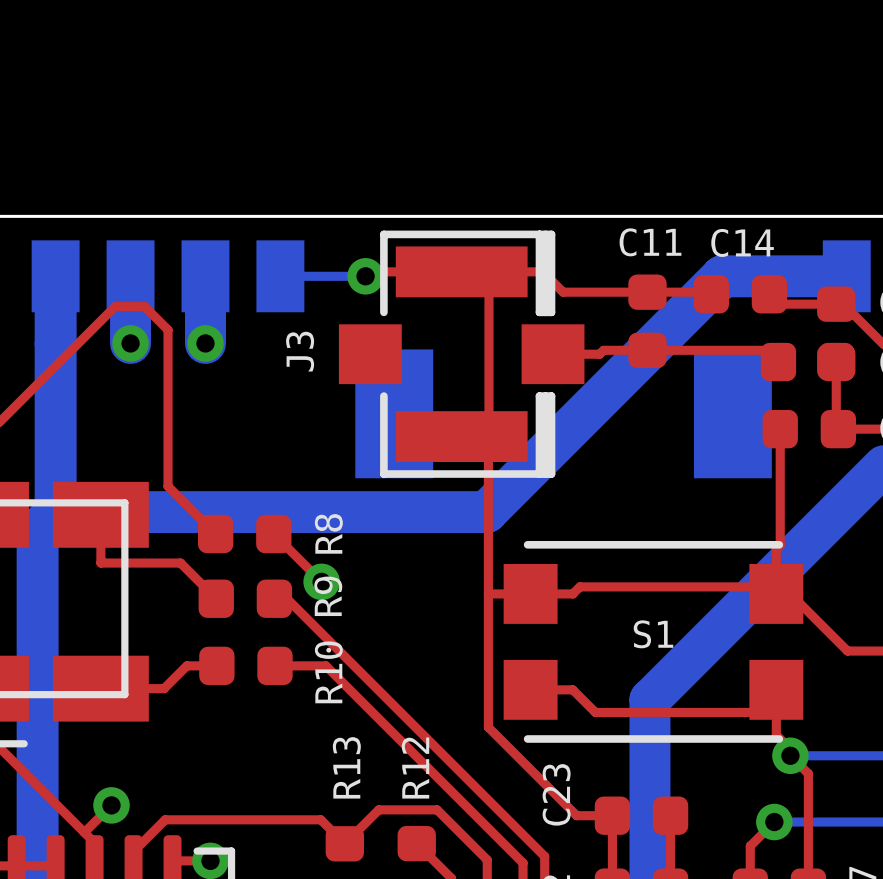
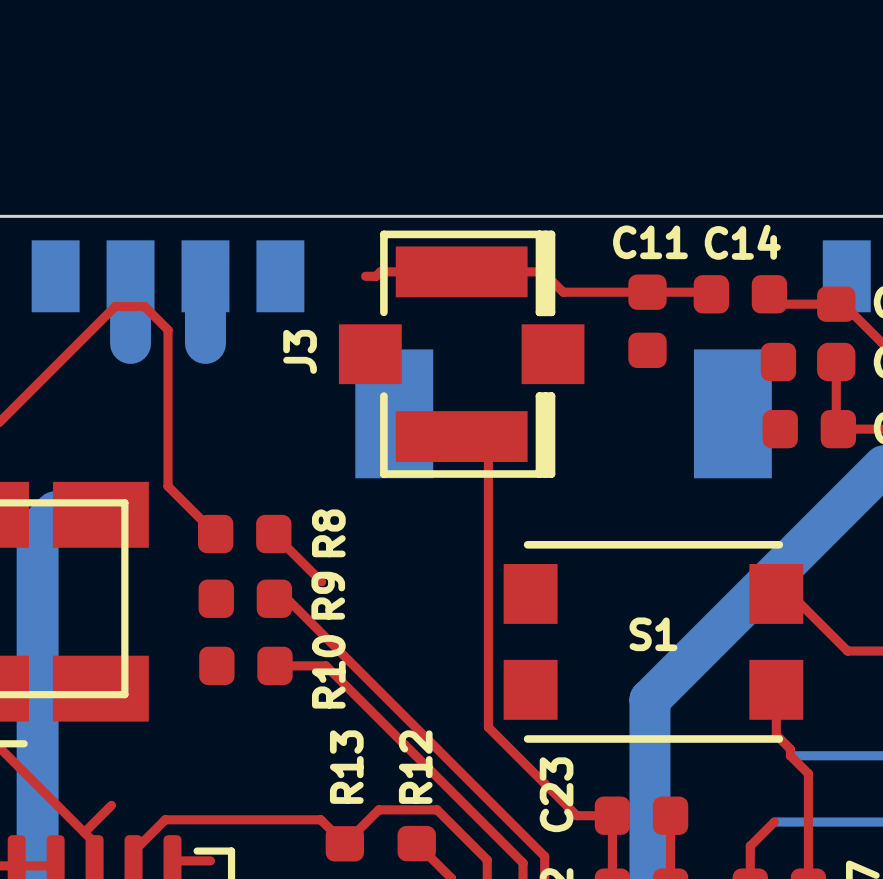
top track: (488, 271) (488, 436) (461, 436) -> none
bottom track: (55, 276) (55, 512) (486, 512) (722, 276) (846, 276) -> none
bottom track: (280, 276) (365, 276) -> none
via: (365, 276) -> none
via: (130, 343) -> none
via: (205, 343) -> none
top track: (553, 354) (599, 354) (603, 350) (766, 350) (778, 362) -> none
top track: (780, 429) (780, 544) (776, 548) (776, 593) -> none
top track: (100, 514) (100, 563) (180, 563) (216, 598) -> none
via: (321, 581) -> none
top track: (776, 586) (579, 586) (572, 593) (488, 593) -> none
top track: (216, 665) (186, 665) (164, 688) (100, 688) -> none
top track: (530, 689) (572, 689) (595, 712) (776, 712) -> none
via: (790, 755) -> none
via: (111, 805) -> none
via: (774, 822) -> none
via: (210, 860) -> none

